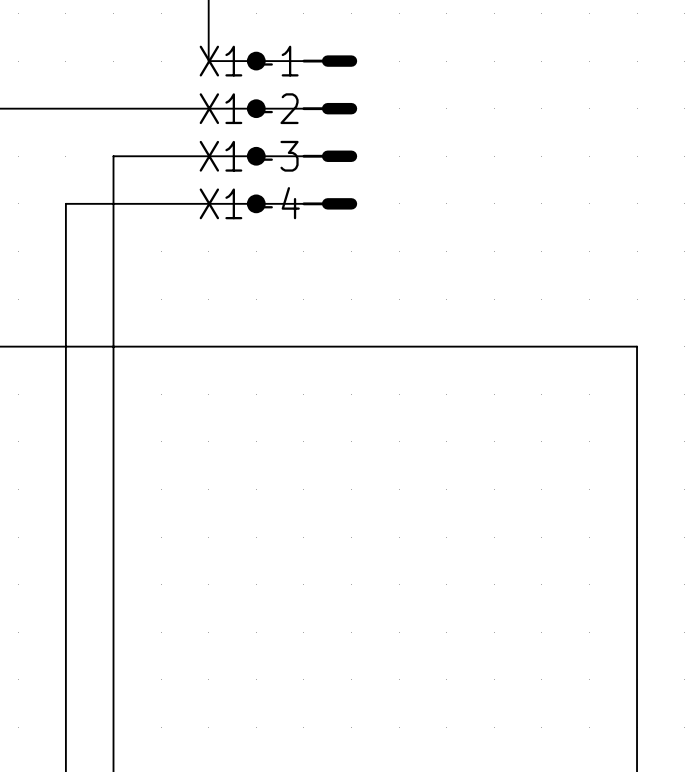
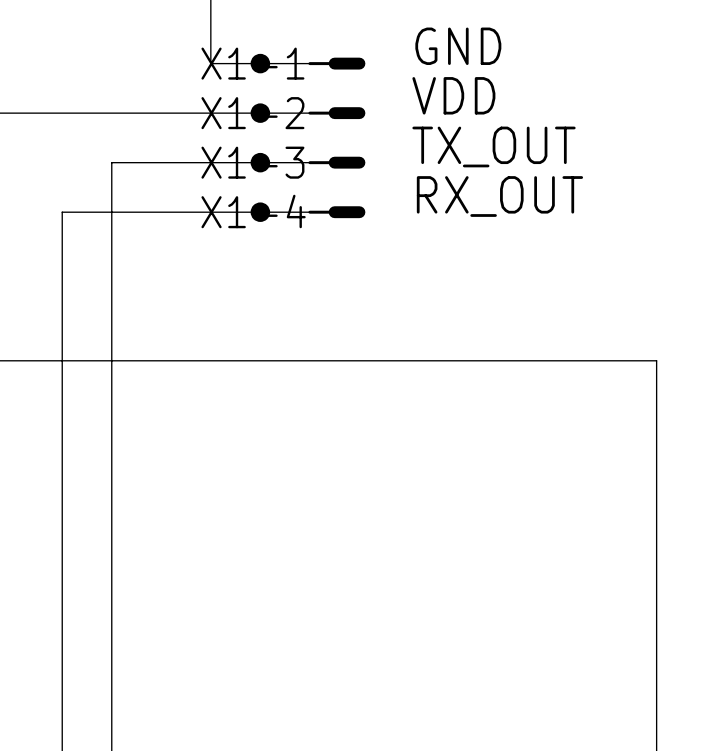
text: none -> GND (458, 46)
text: none -> VDD (453, 95)
text: none -> TX_OUT (494, 146)
text: none -> RX_OUT (499, 196)

